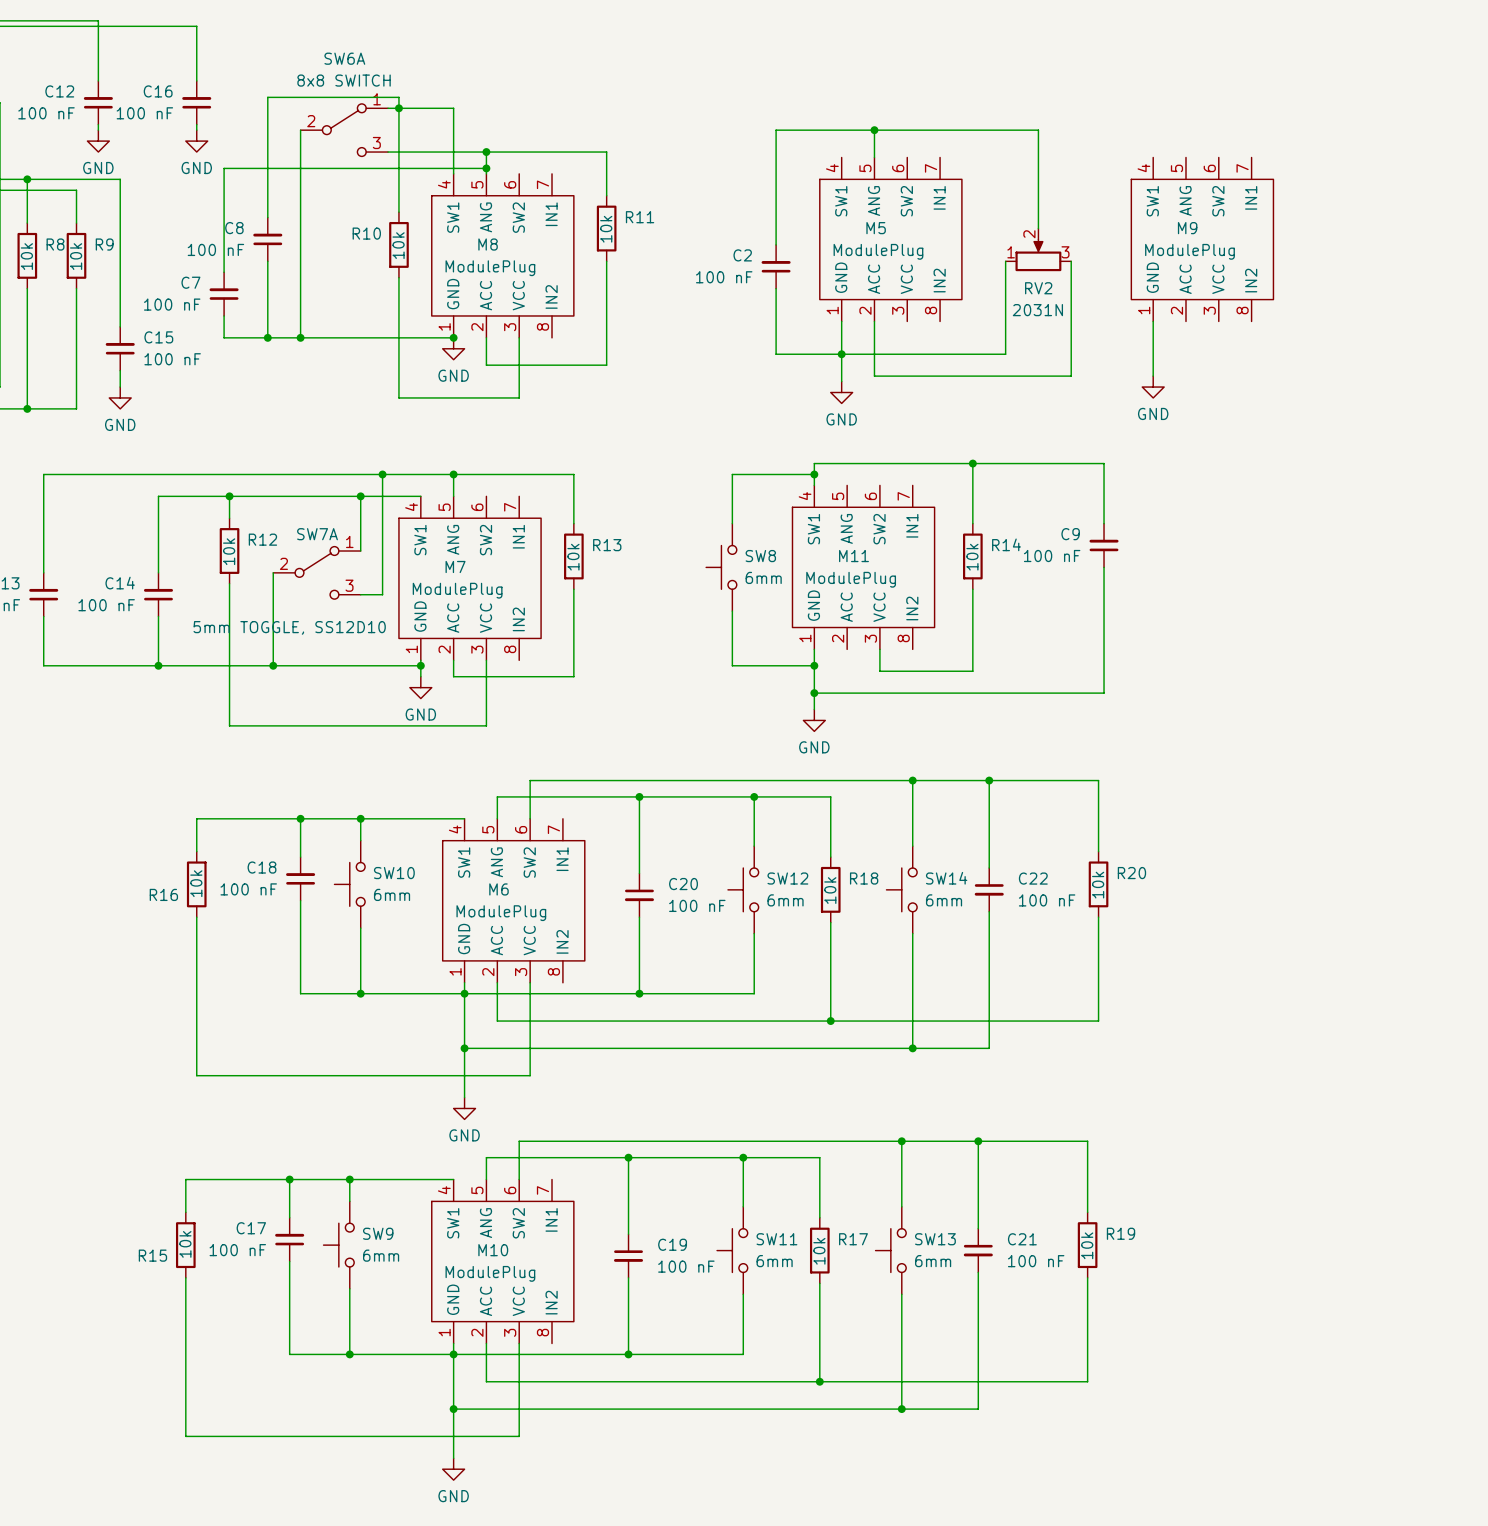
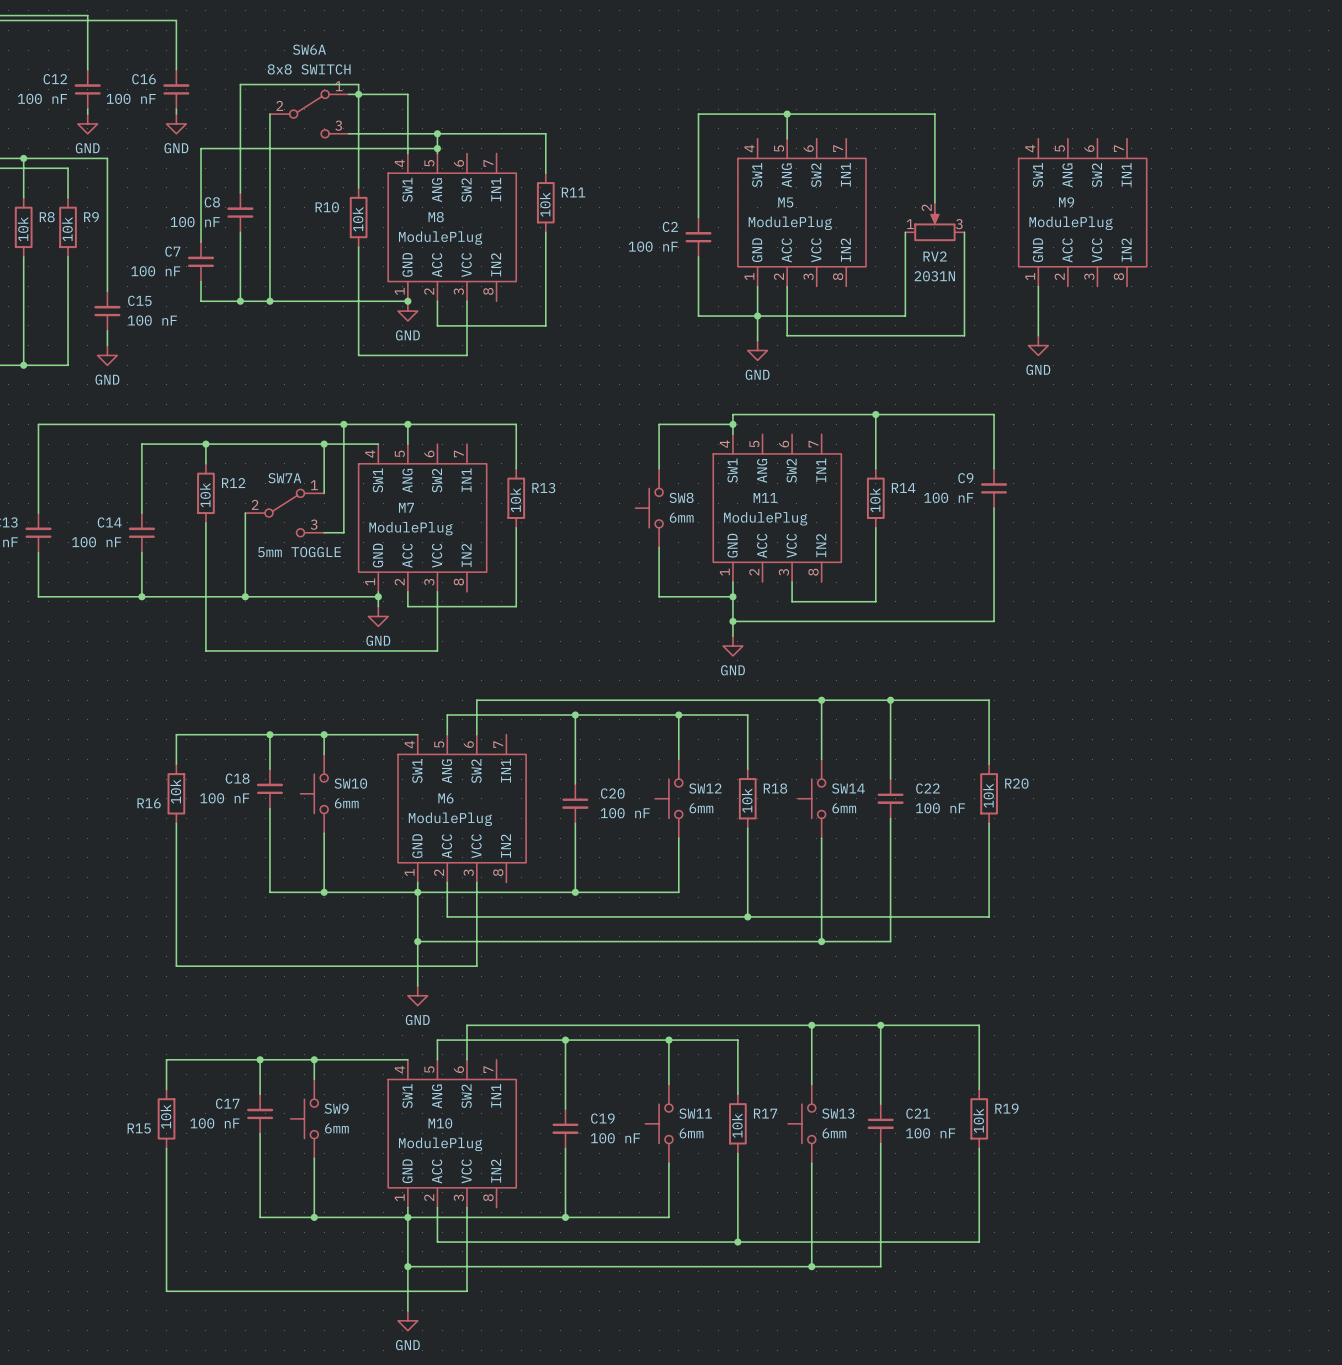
SW7A value: 5mm TOGGLE, SS12D10 (289, 627) -> 5mm TOGGLE (299, 552)

